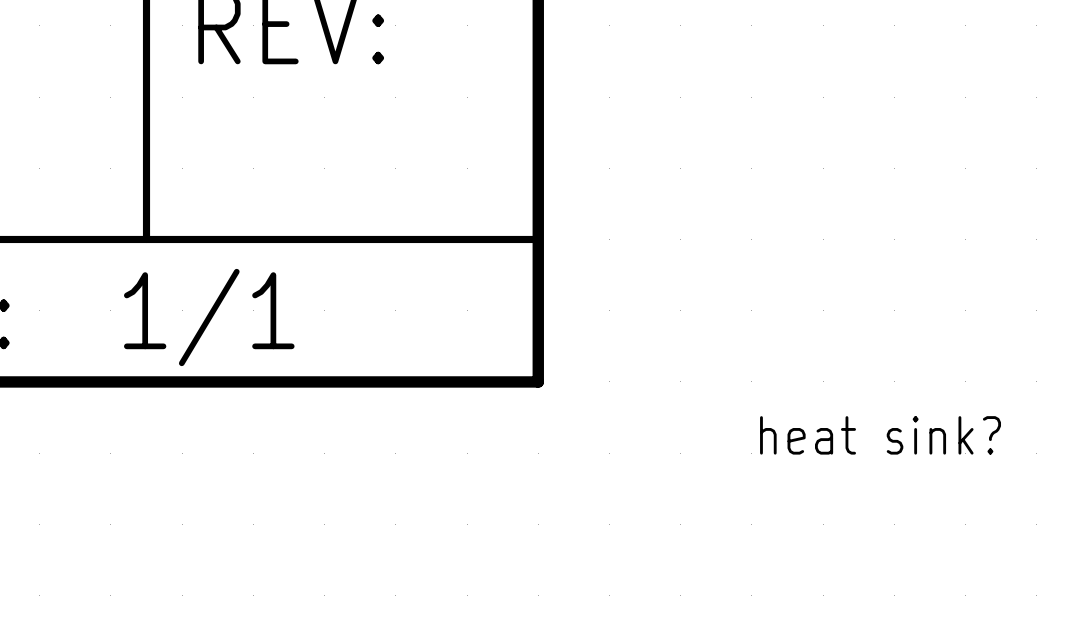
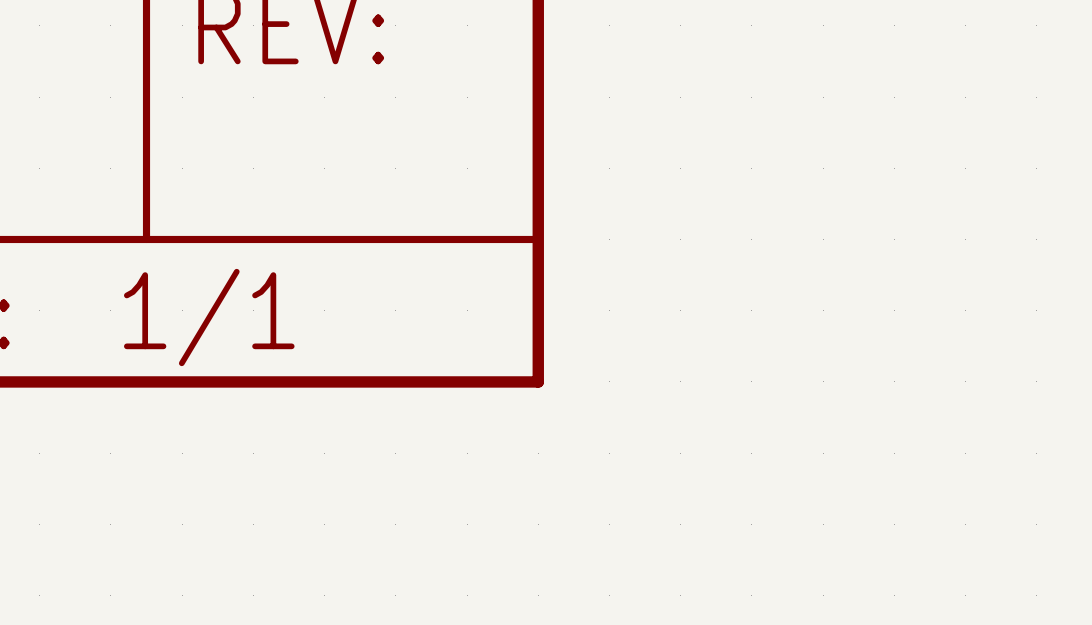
text: heat sink? (880, 435) -> none

